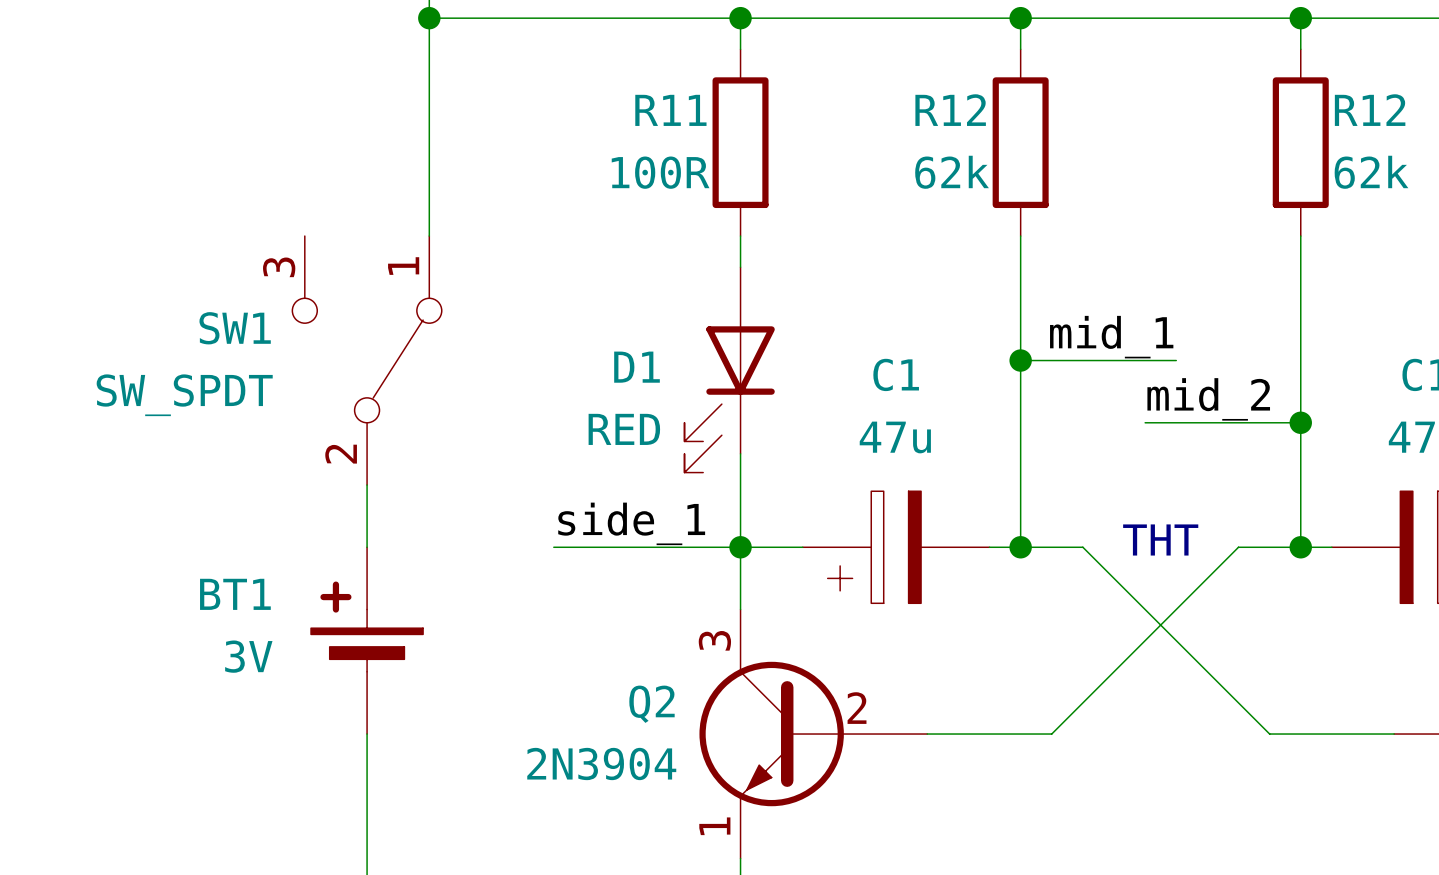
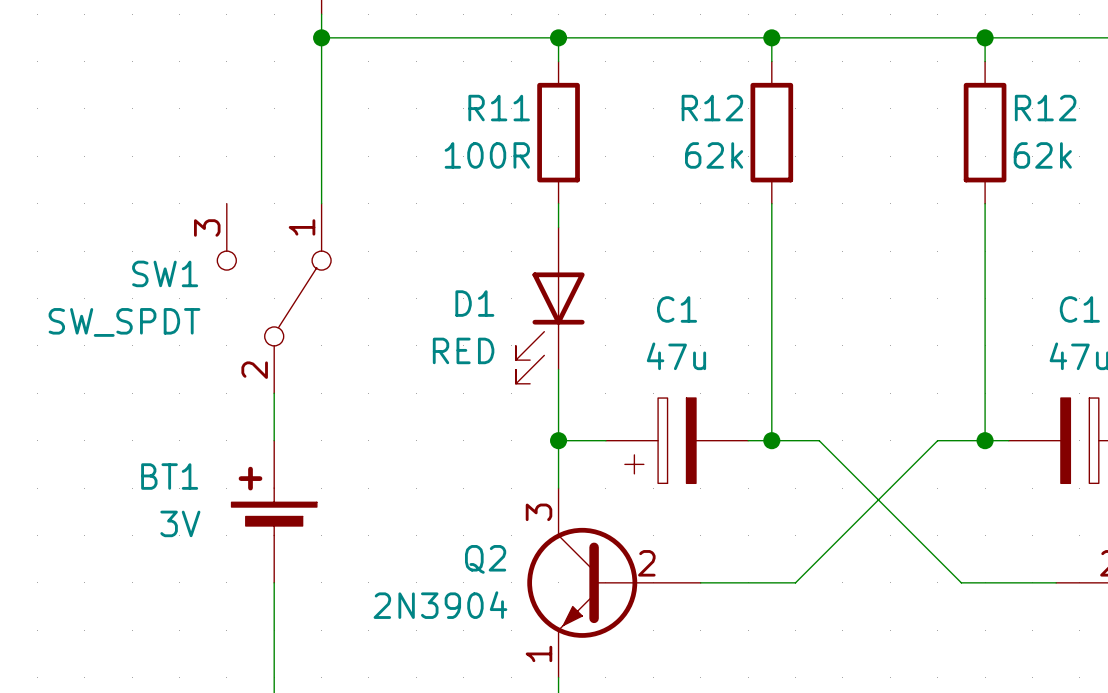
label: mid_1 (1111, 337) -> none
wire: (1020, 360) (1176, 360) -> none
junction: (1020, 360) -> none
label: mid_2 (1208, 399) -> none
wire: (1145, 422) (1300, 422) -> none
junction: (1300, 422) -> none
label: side_1 (631, 523) -> none
text: THT (1160, 539) -> none
wire: (553, 547) (740, 547) -> none

